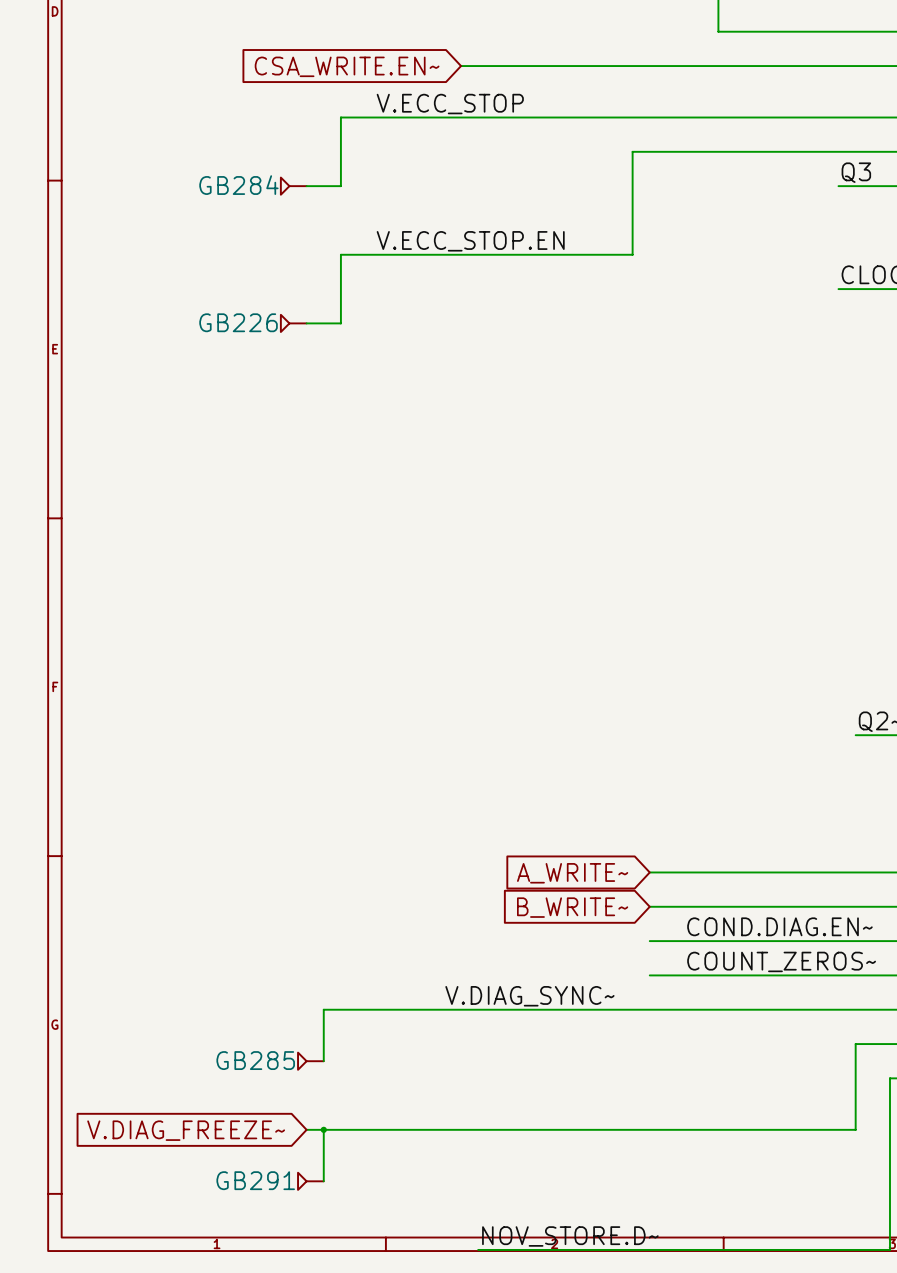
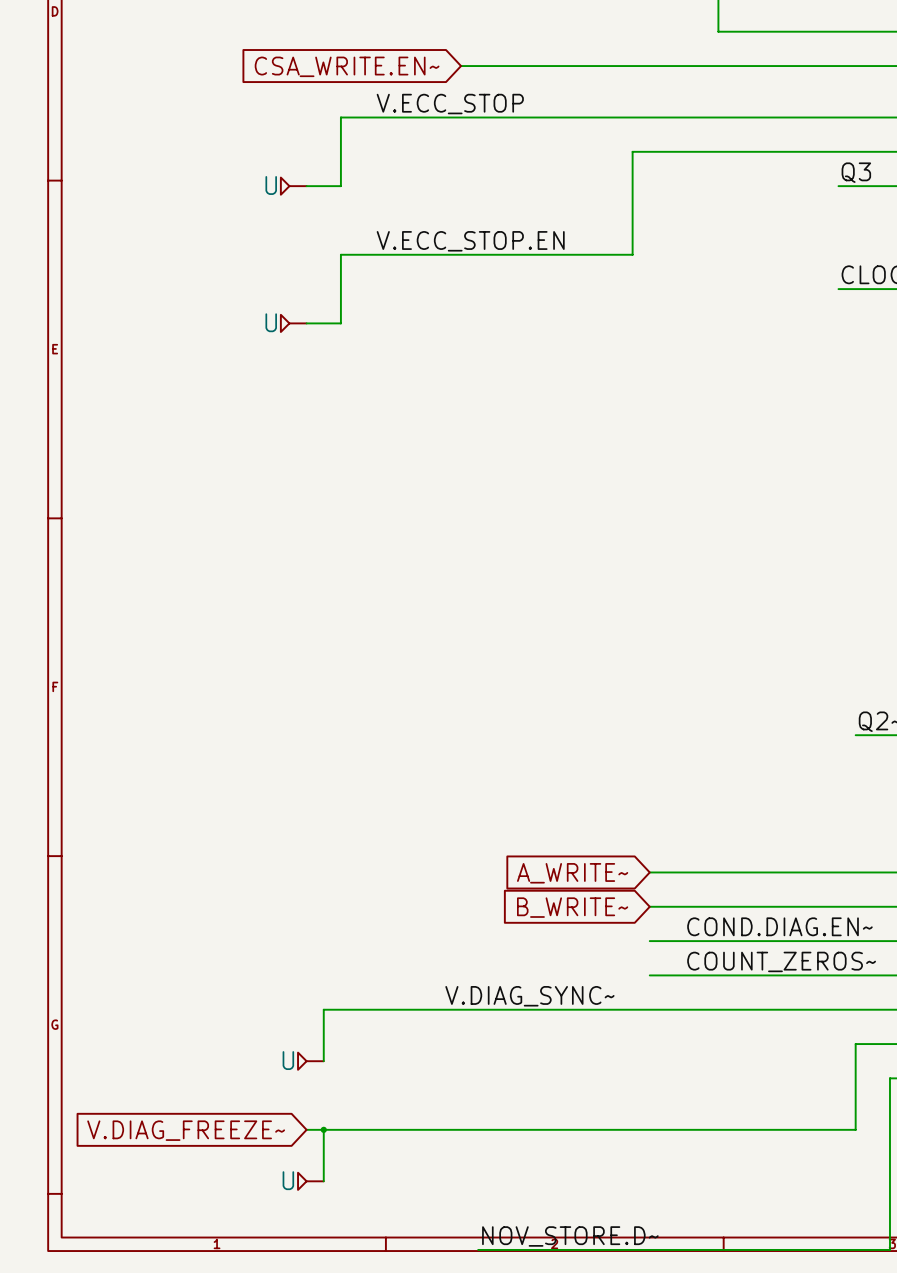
GB284 name: GB284 (238, 185) -> U (271, 185)
GB226 name: GB226 (238, 322) -> U (271, 322)
GB285 name: GB285 (255, 1060) -> U (288, 1060)
GB291 name: GB291 (255, 1180) -> U (288, 1180)

